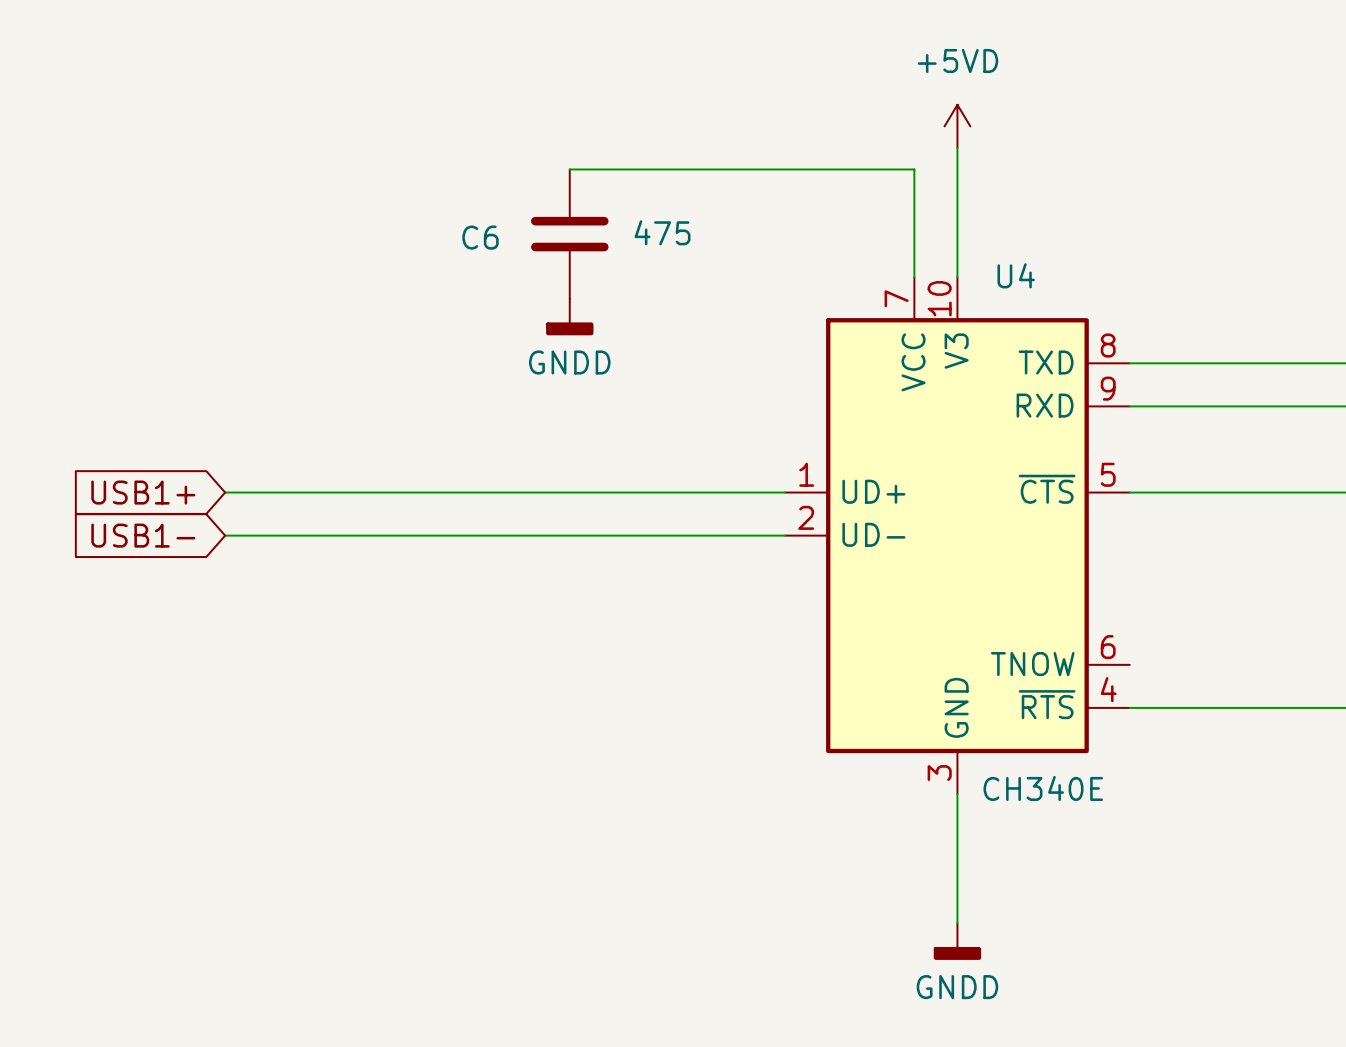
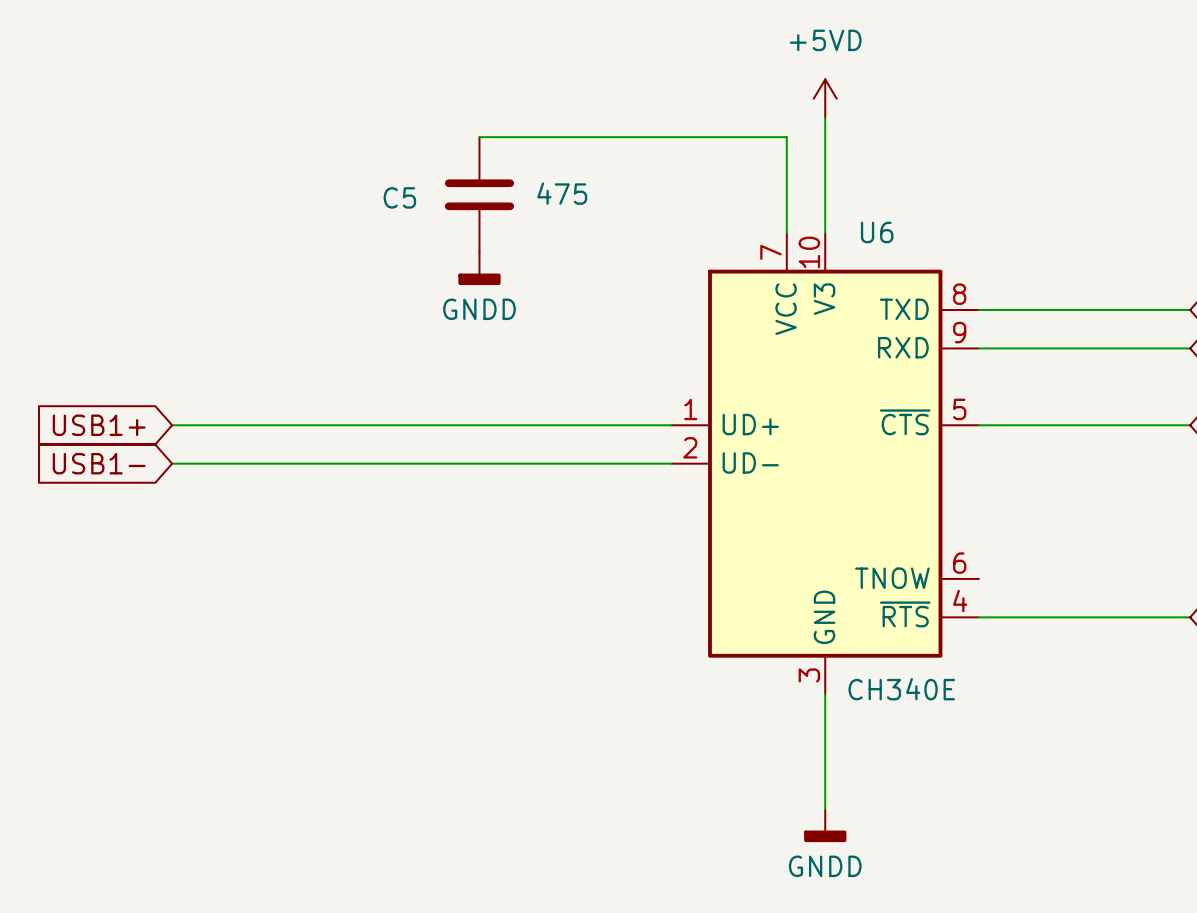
C6 name: C6 (480, 237) -> C5 (399, 197)
U4 name: U4 (1016, 275) -> U6 (877, 232)

